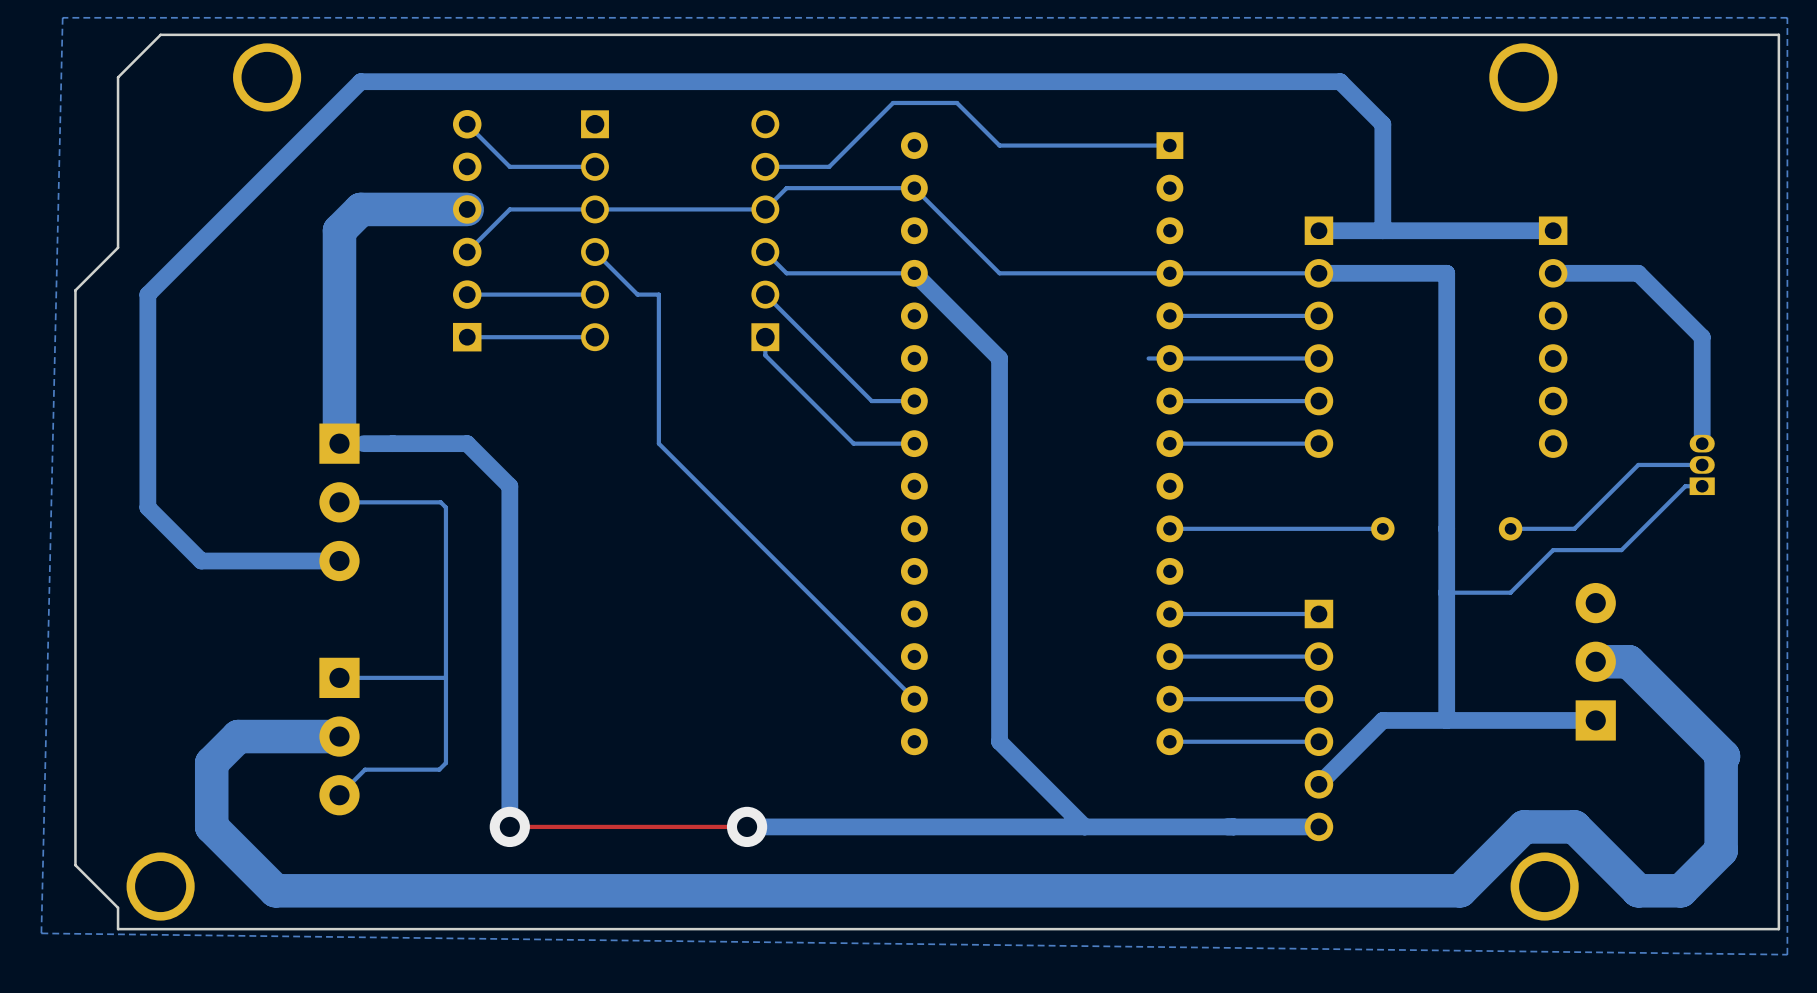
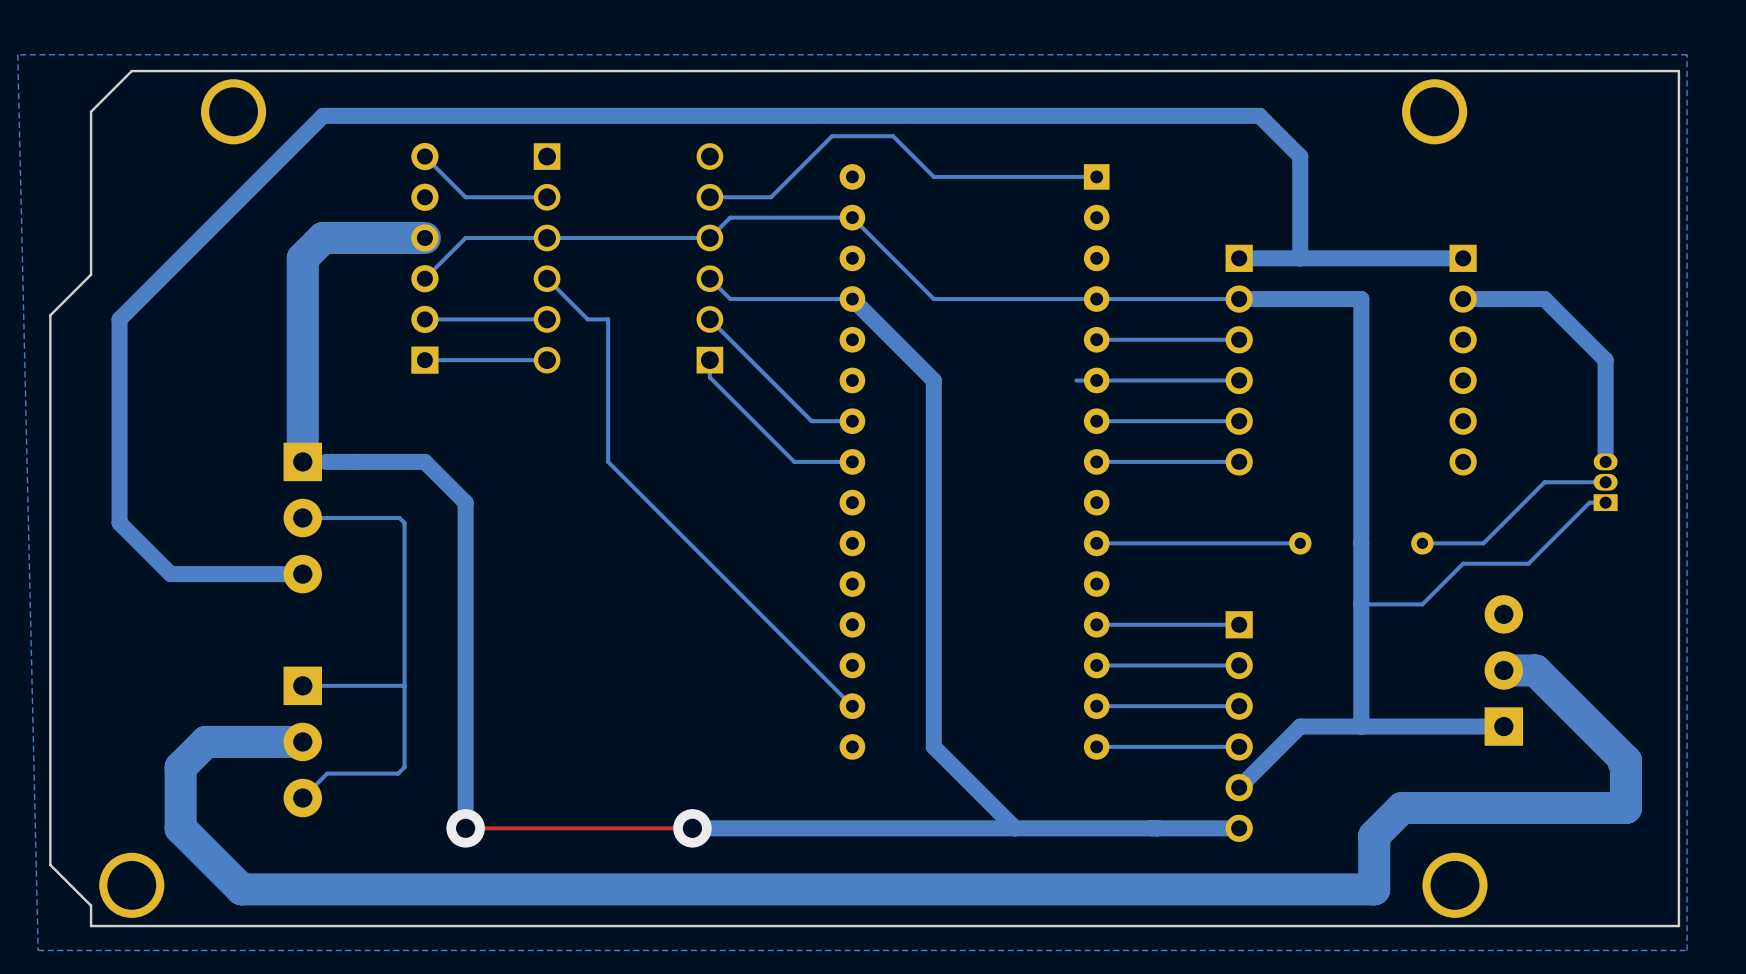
bottom zone outline: (62, 17) (41, 933) (1787, 954) -> (38, 54) (17, 54) (38, 950) (1687, 950)
bottom track: (1721, 758) (1721, 850) (1680, 890) (1638, 890) (1574, 826) (1524, 826) (1460, 890) -> (1625, 760) (1625, 807) (1402, 807) (1374, 835) (1374, 889)

